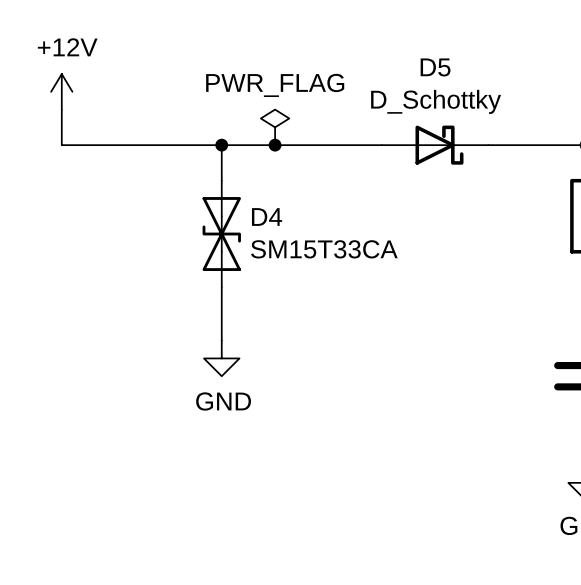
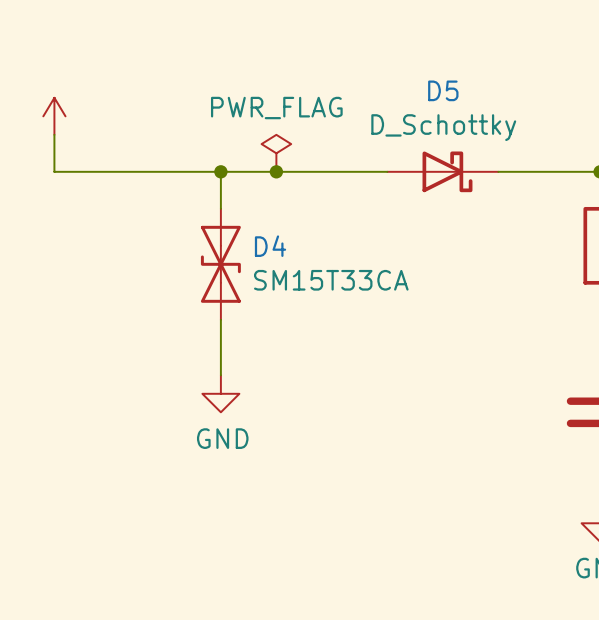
power symbol text: +12V (67, 47) -> none

